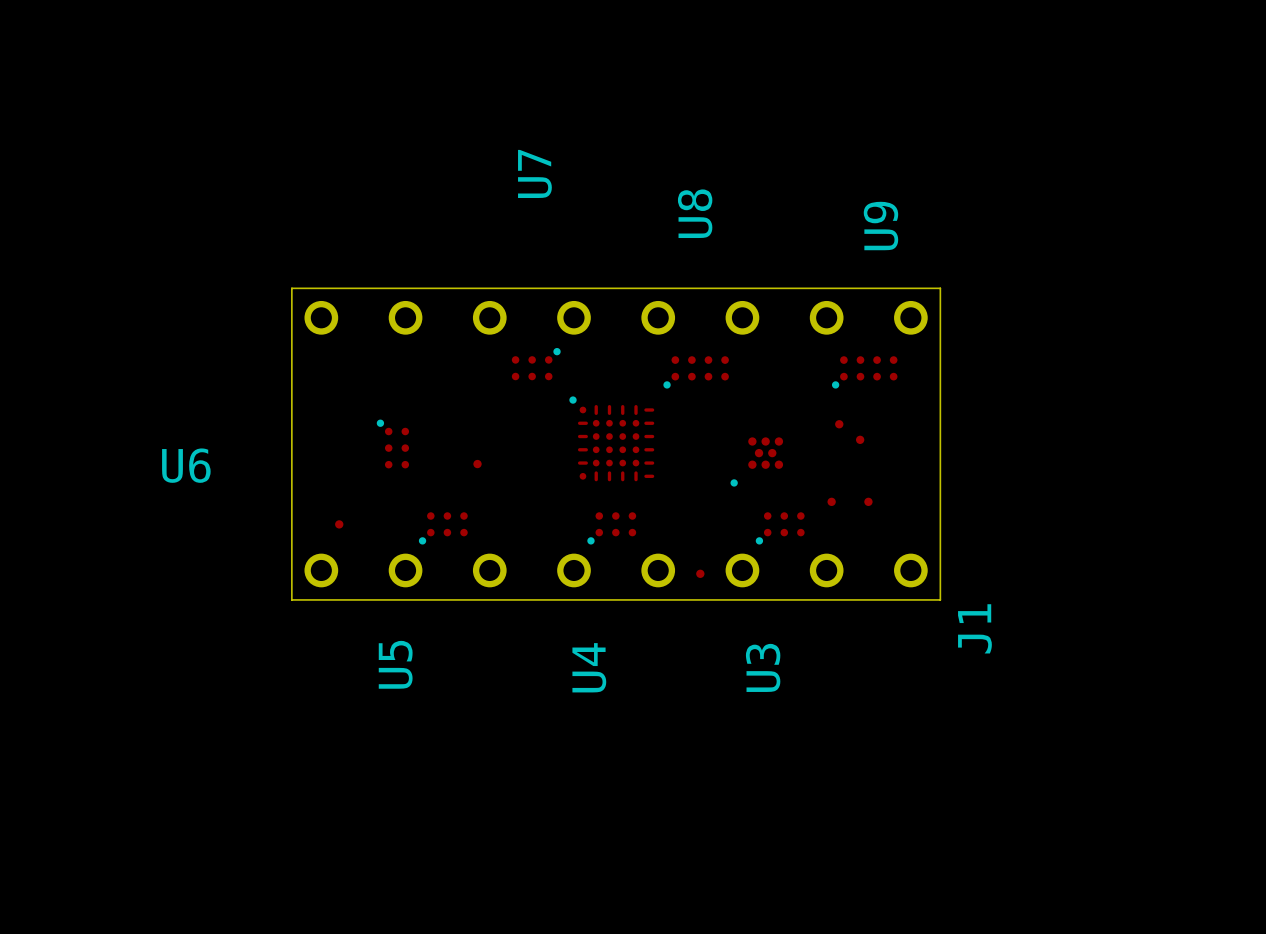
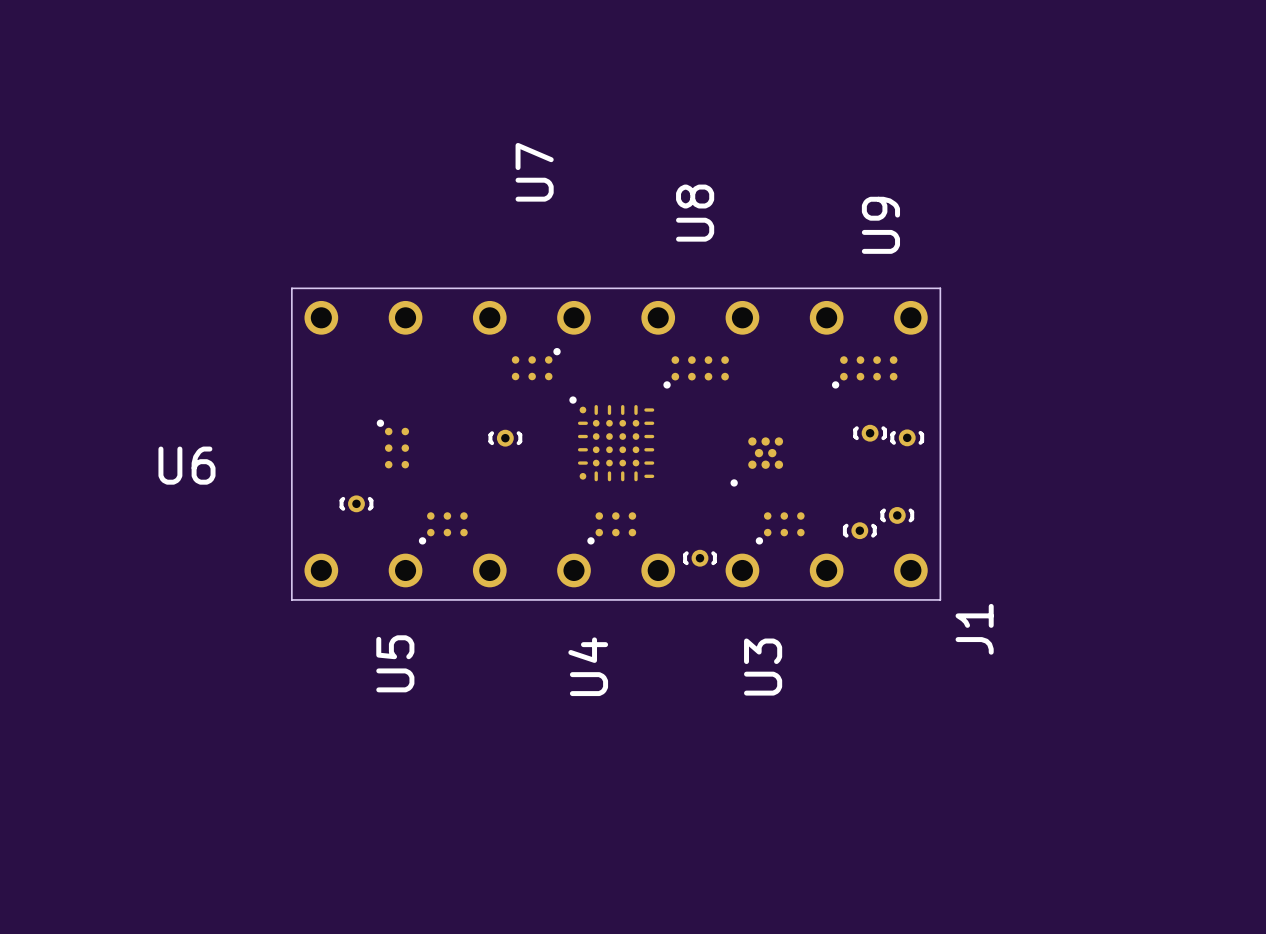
part: (839, 424) -> none
part footprint: [856, 435, 865, 444] -> [853, 424, 888, 442]
part: none -> (907, 437)
part: none -> (505, 438)
part: (477, 464) -> none
part: (831, 501) -> none
part: (868, 501) -> none
part: none -> (897, 515)
part footprint: [335, 520, 344, 529] -> [339, 495, 374, 513]
part: none -> (859, 530)
part footprint: [696, 569, 705, 578] -> [683, 549, 717, 567]

